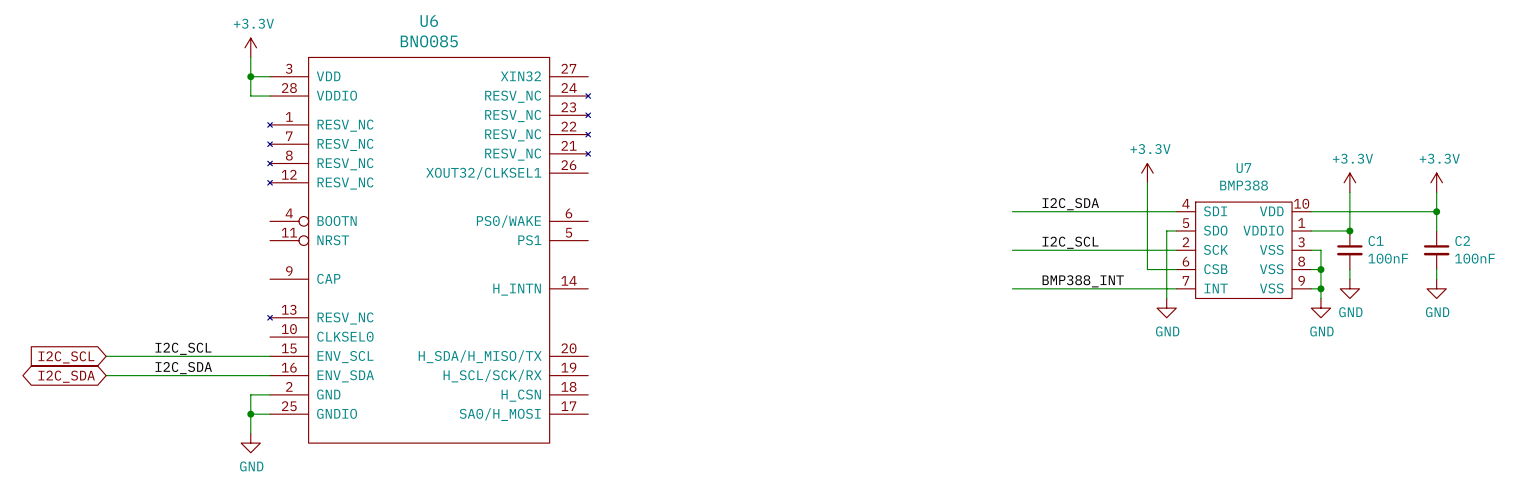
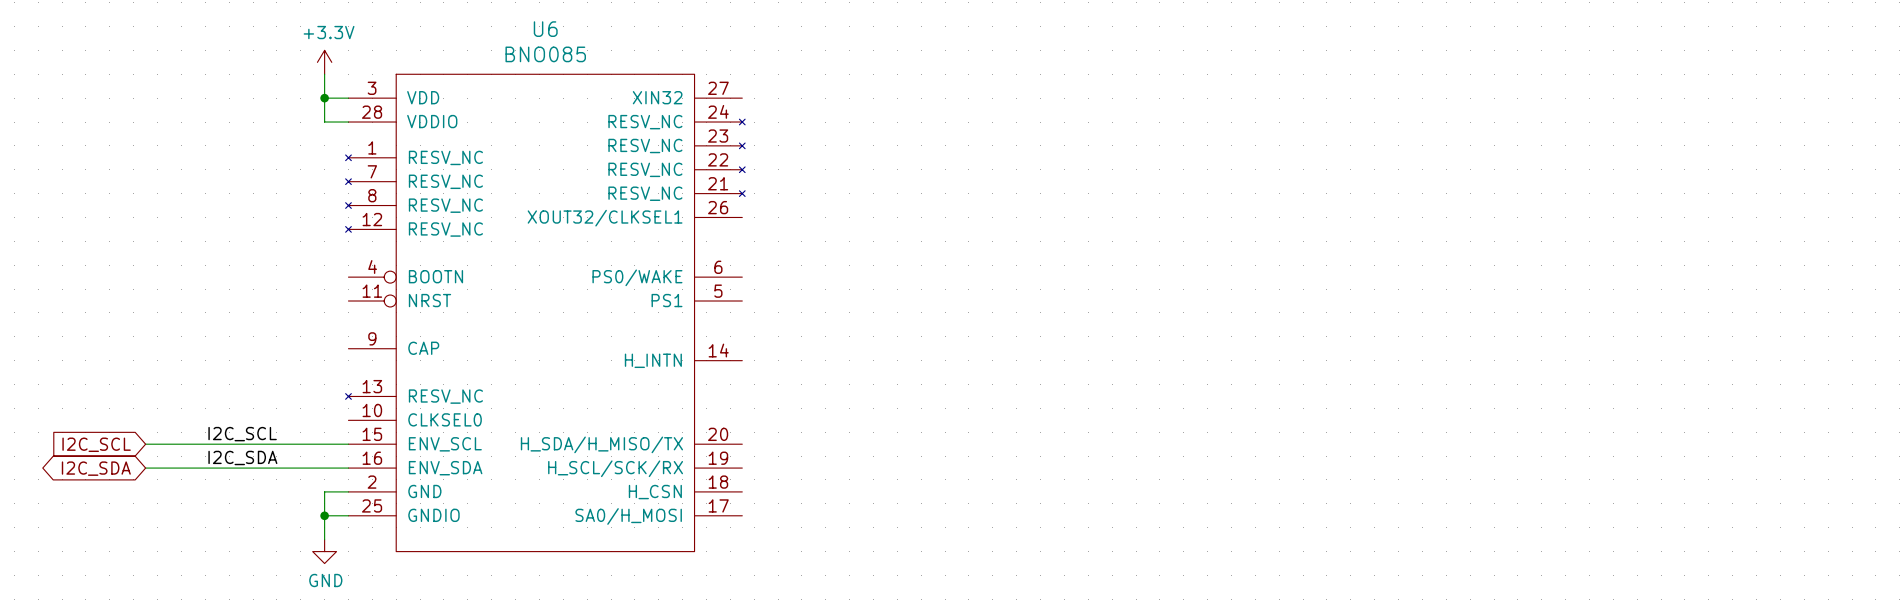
power symbol: +3.3V (1147, 173) -> none
wire: (1147, 182) (1147, 269) (1176, 269) -> none
power symbol: +3.3V (1349, 182) -> none
power symbol: +3.3V (1436, 182) -> none
wire: (1349, 192) (1349, 230) (1311, 230) -> none
wire: (1436, 192) (1436, 230) -> none
label: I2C_SDA (1070, 204) -> none
wire: (1012, 211) (1176, 211) -> none
wire: (1311, 211) (1436, 211) -> none
junction: (1436, 211) -> none
wire: (1176, 230) (1166, 230) (1166, 298) -> none
junction: (1349, 230) -> none
label: I2C_SCL (1070, 242) -> none
wire: (1012, 250) (1176, 250) -> none
U7: BMP388 (1243, 250) -> none
wire: (1311, 250) (1320, 250) (1320, 298) -> none
C1: 100nF (1349, 250) -> none
C2: 100nF (1436, 250) -> none
wire: (1311, 269) (1320, 269) -> none
junction: (1320, 269) -> none
wire: (1349, 269) (1349, 279) -> none
wire: (1436, 269) (1436, 279) -> none
label: BMP388_INT (1083, 281) -> none
wire: (1012, 288) (1176, 288) -> none
wire: (1311, 288) (1320, 288) -> none
junction: (1320, 288) -> none
power symbol: GND (1349, 288) -> none
power symbol: GND (1436, 288) -> none
power symbol: GND (1166, 308) -> none
power symbol: GND (1320, 308) -> none

